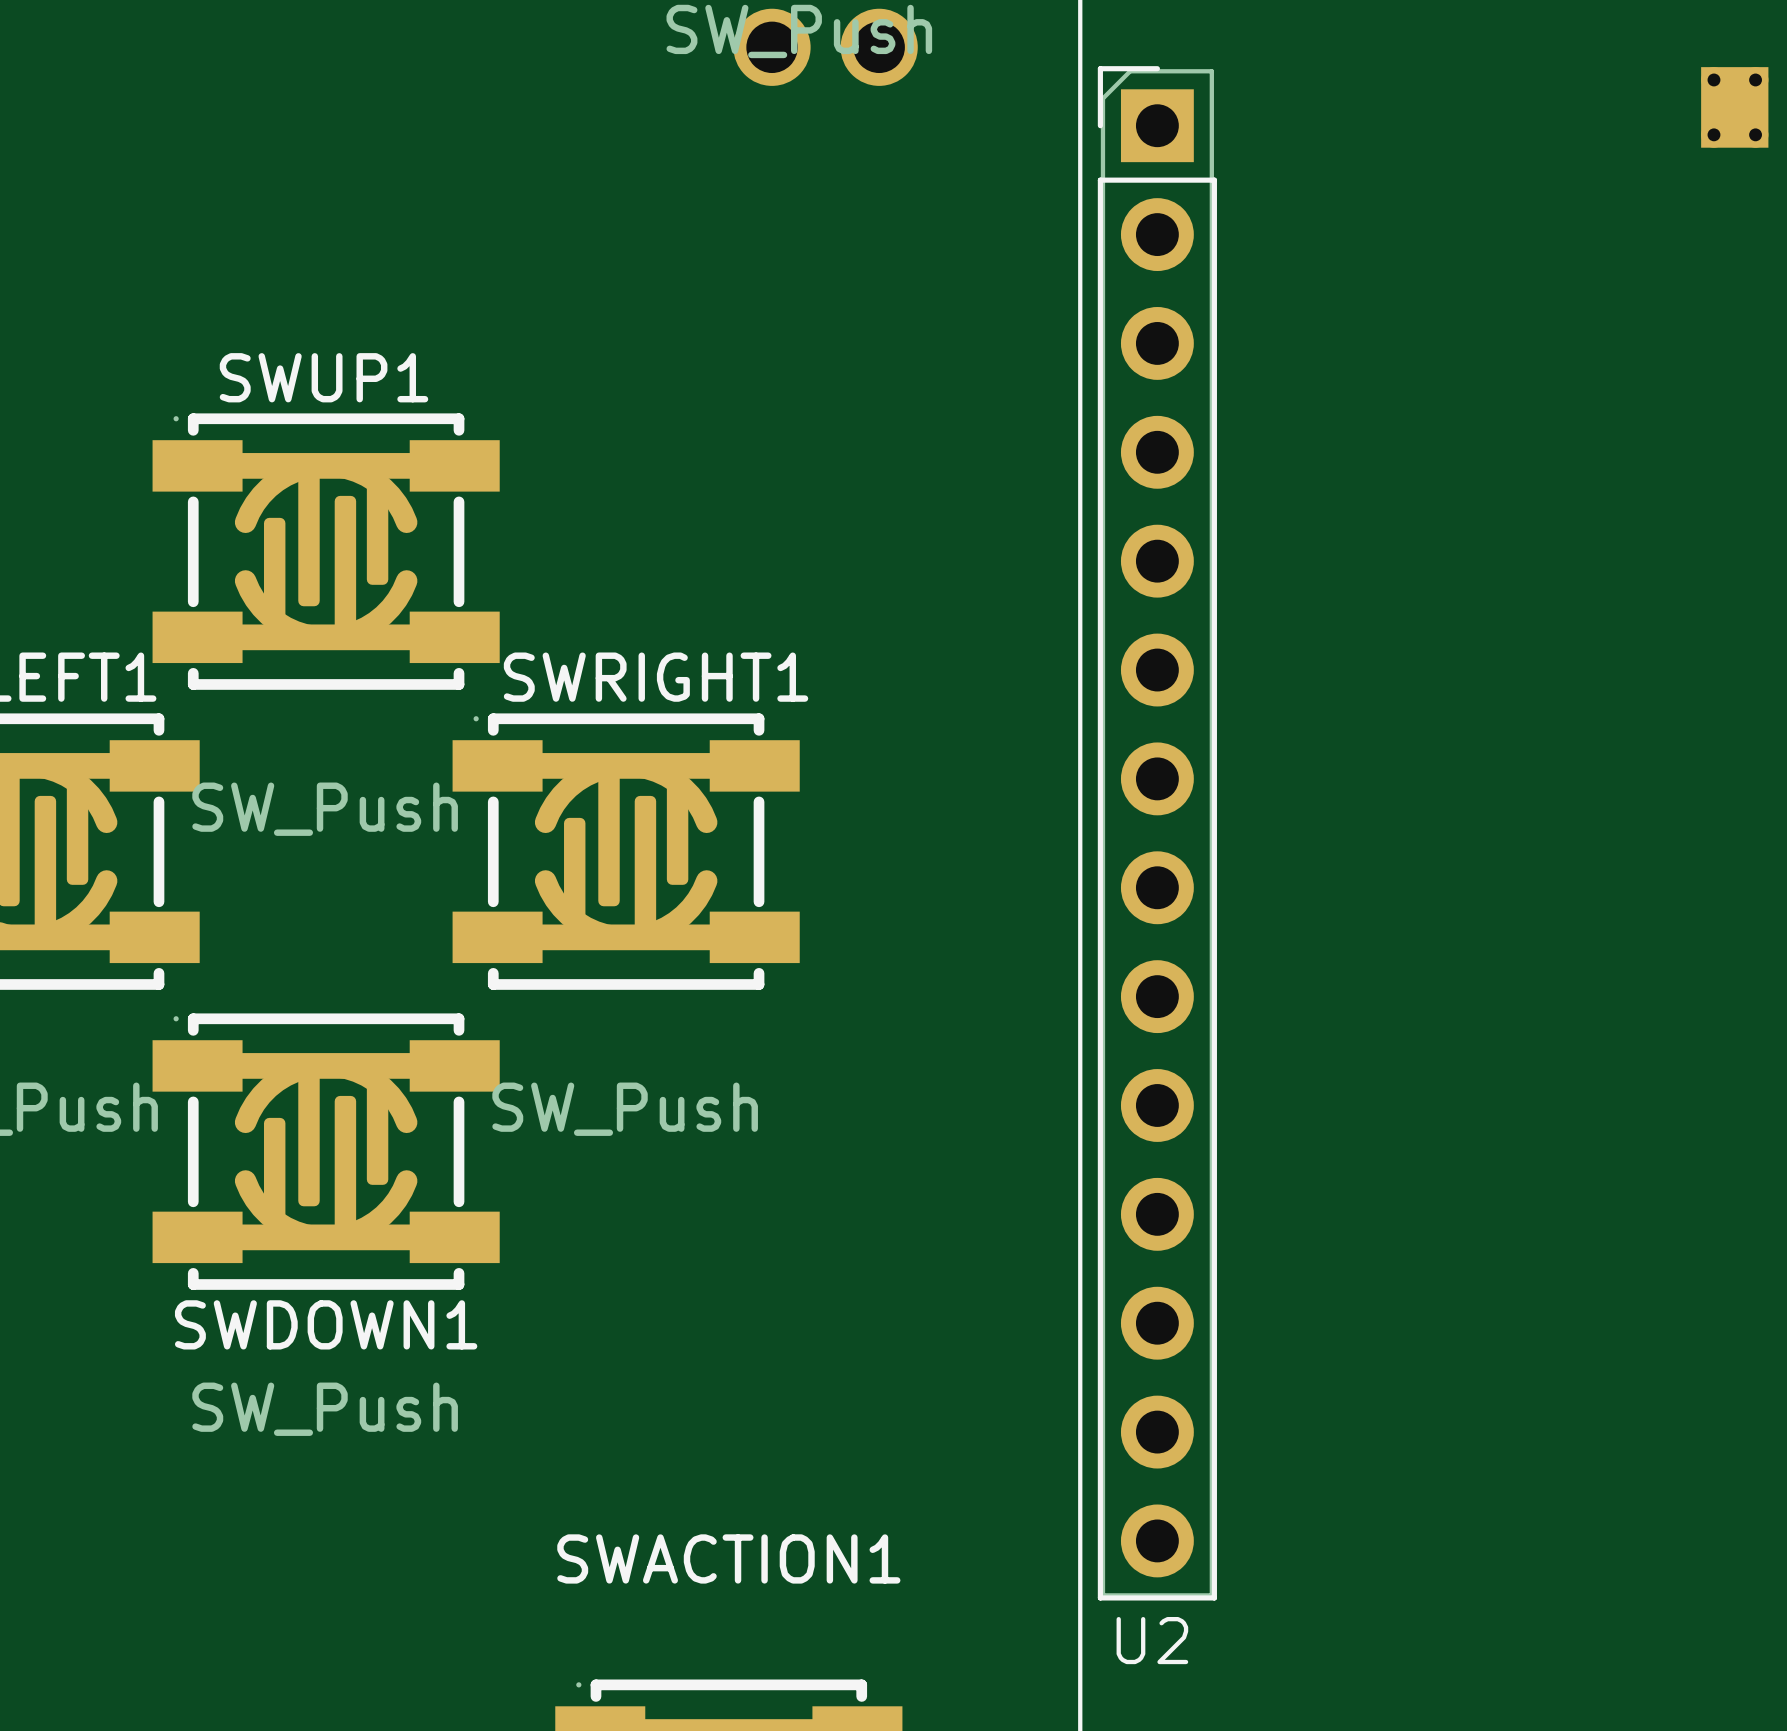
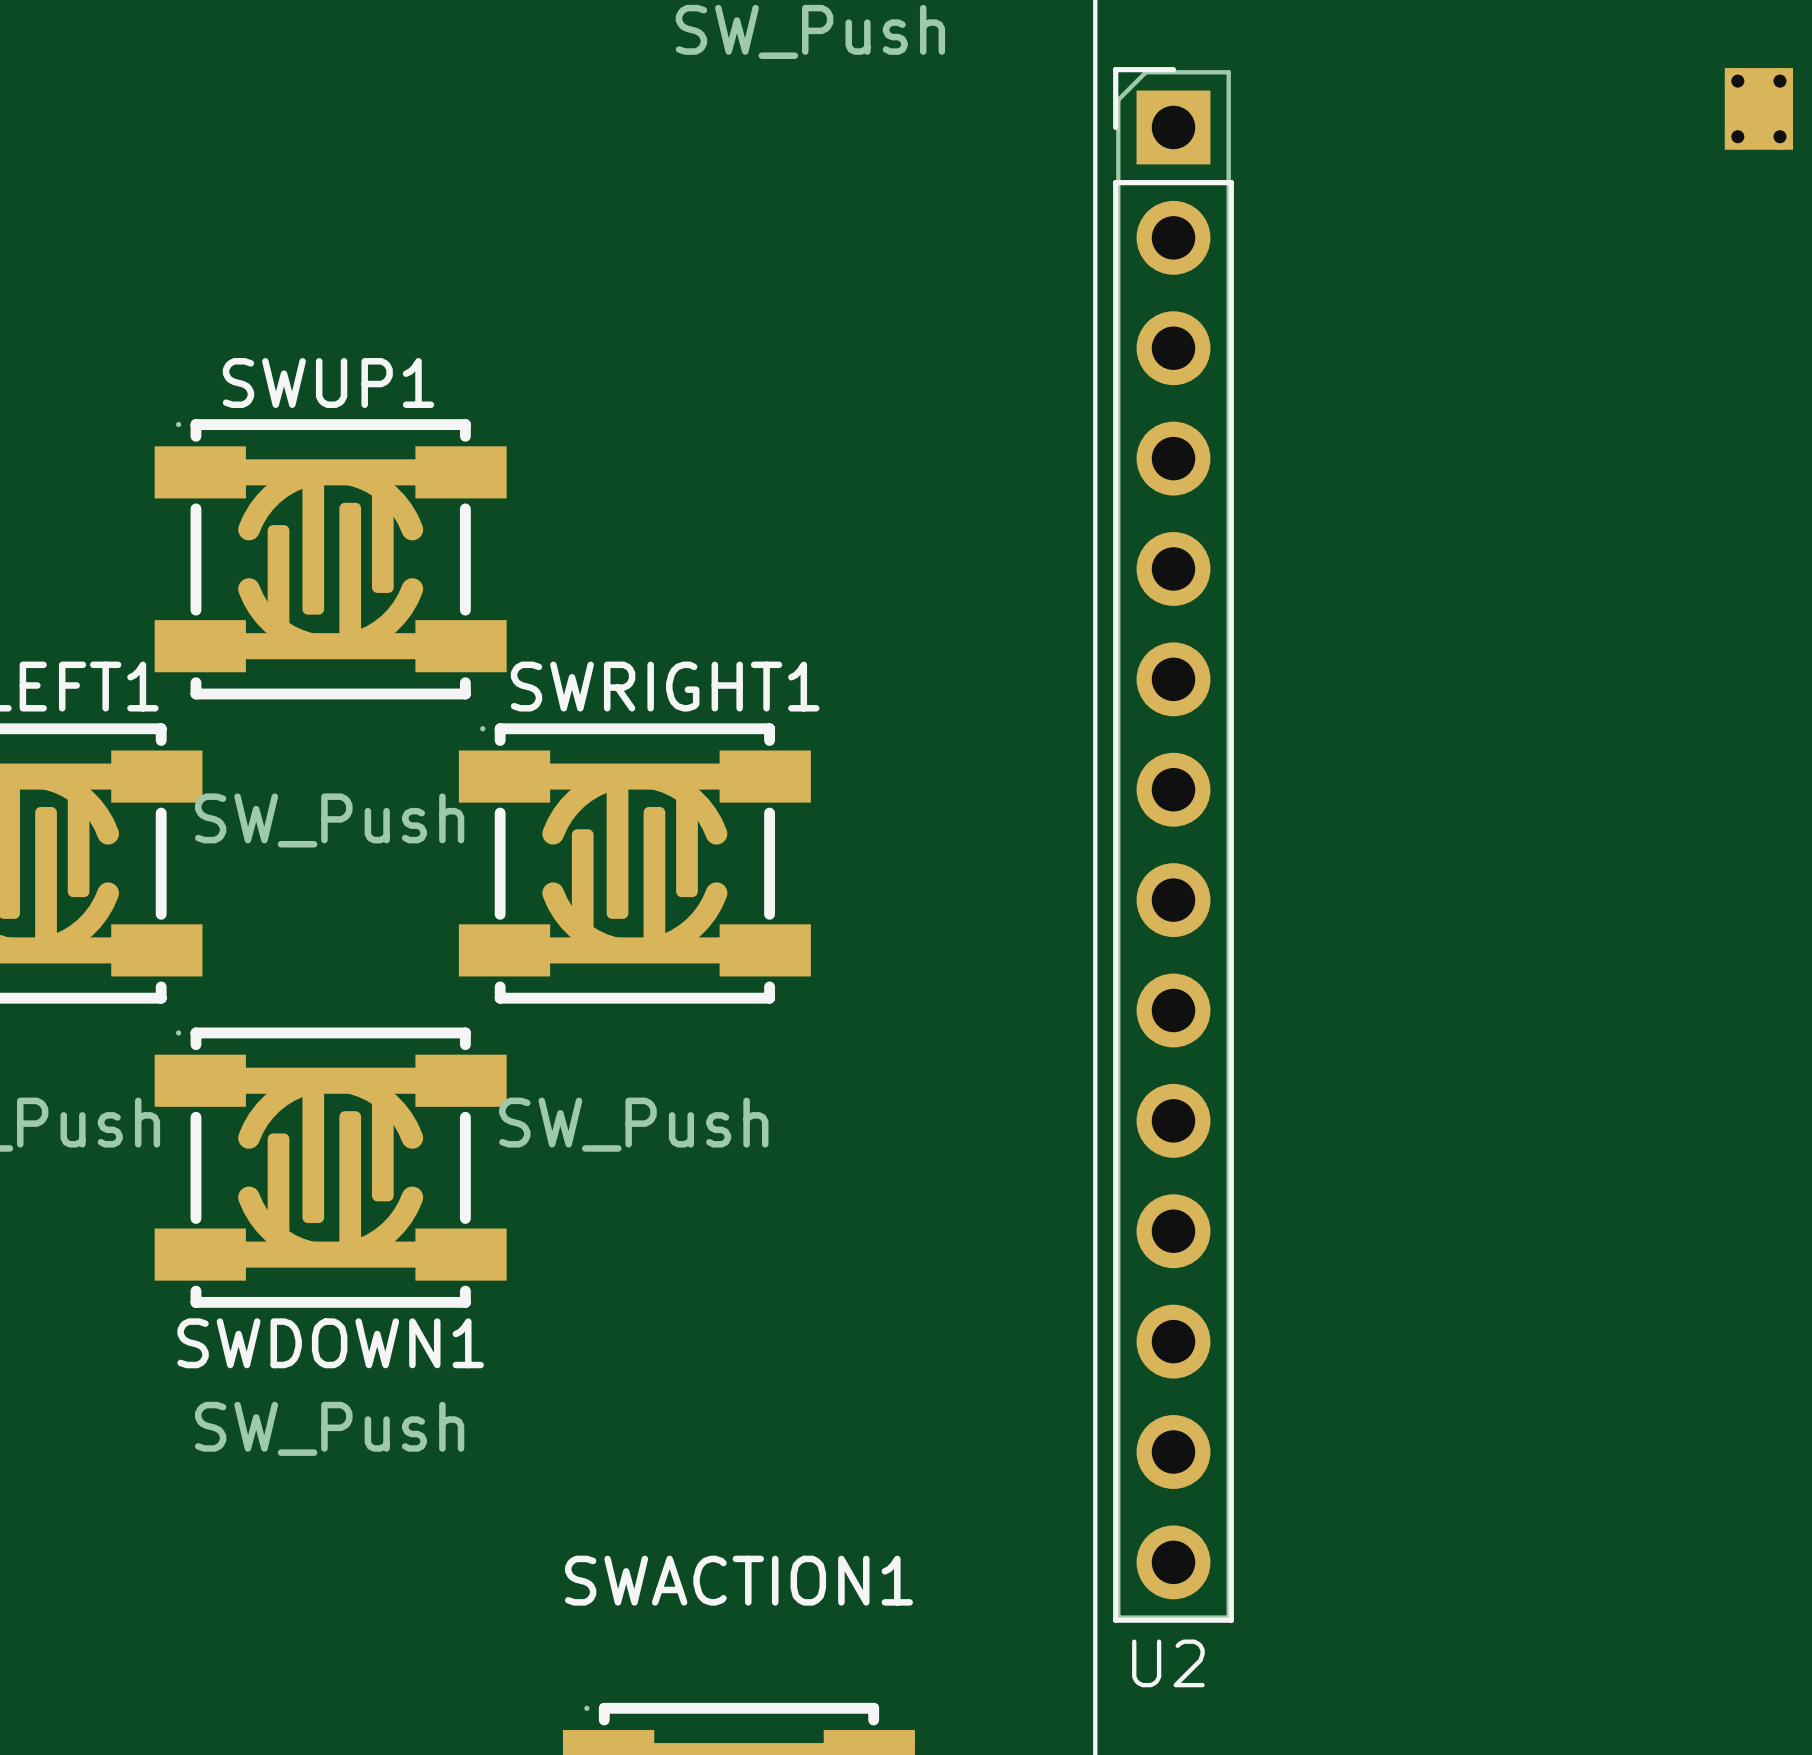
part: (825, 47) -> none

